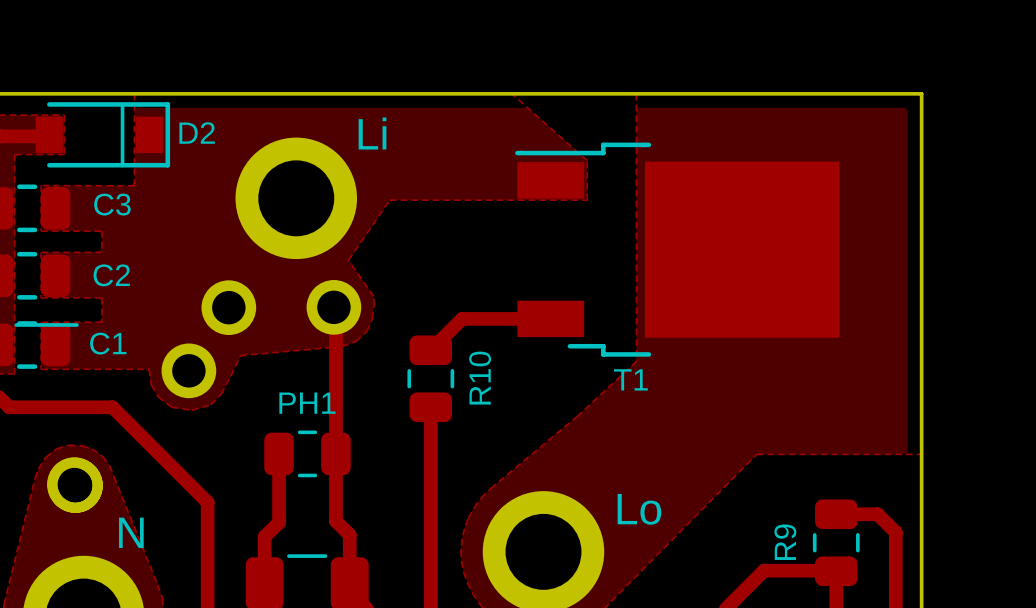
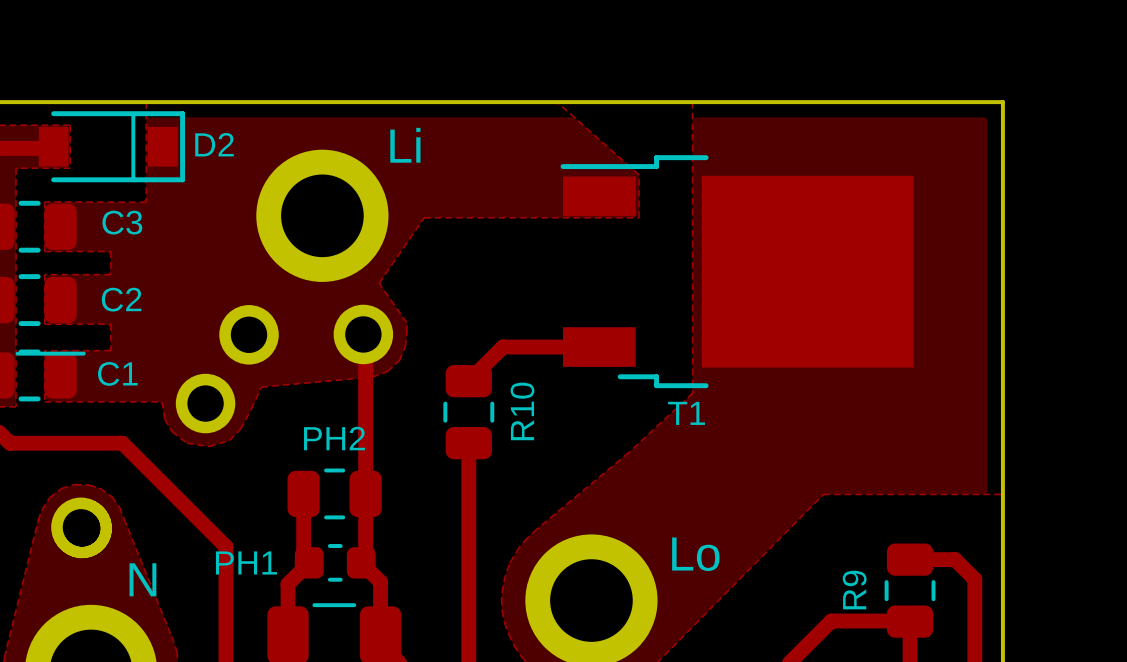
PH1 name: PH1 (307, 403) -> PH2 (334, 438)
PH1: none -> (335, 562)

